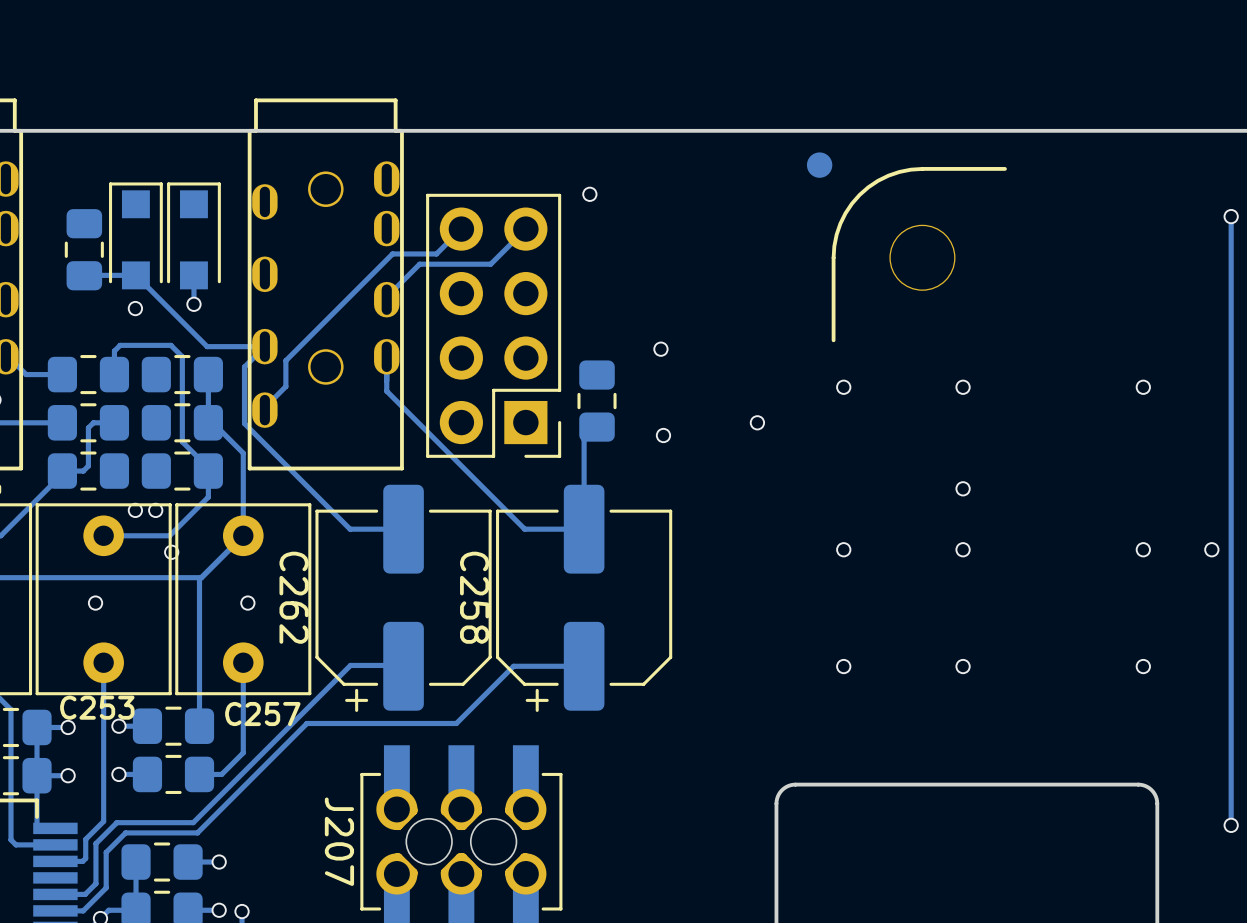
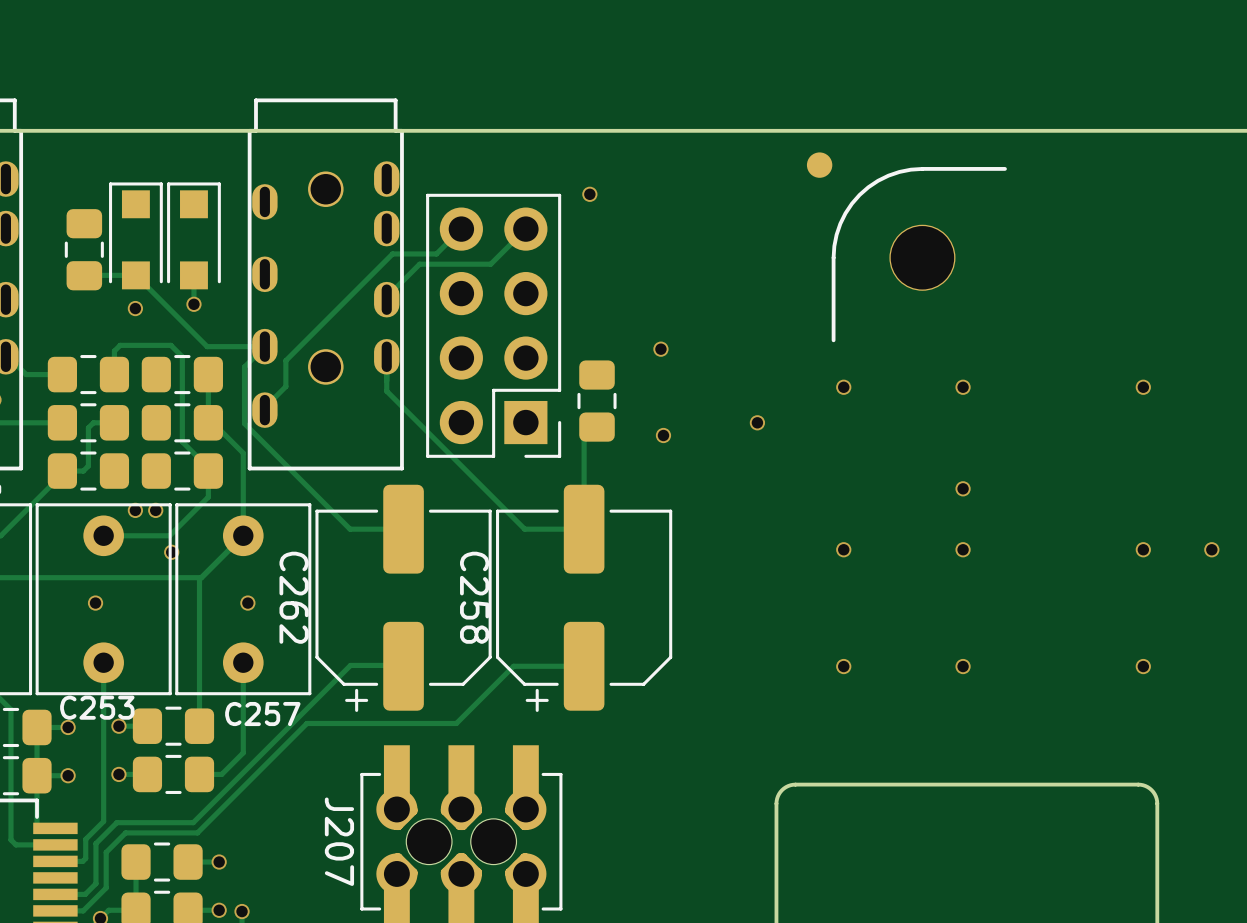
track: (1231, 216) (1231, 825) -> none
via: (1231, 216) -> none
via: (1231, 825) -> none

